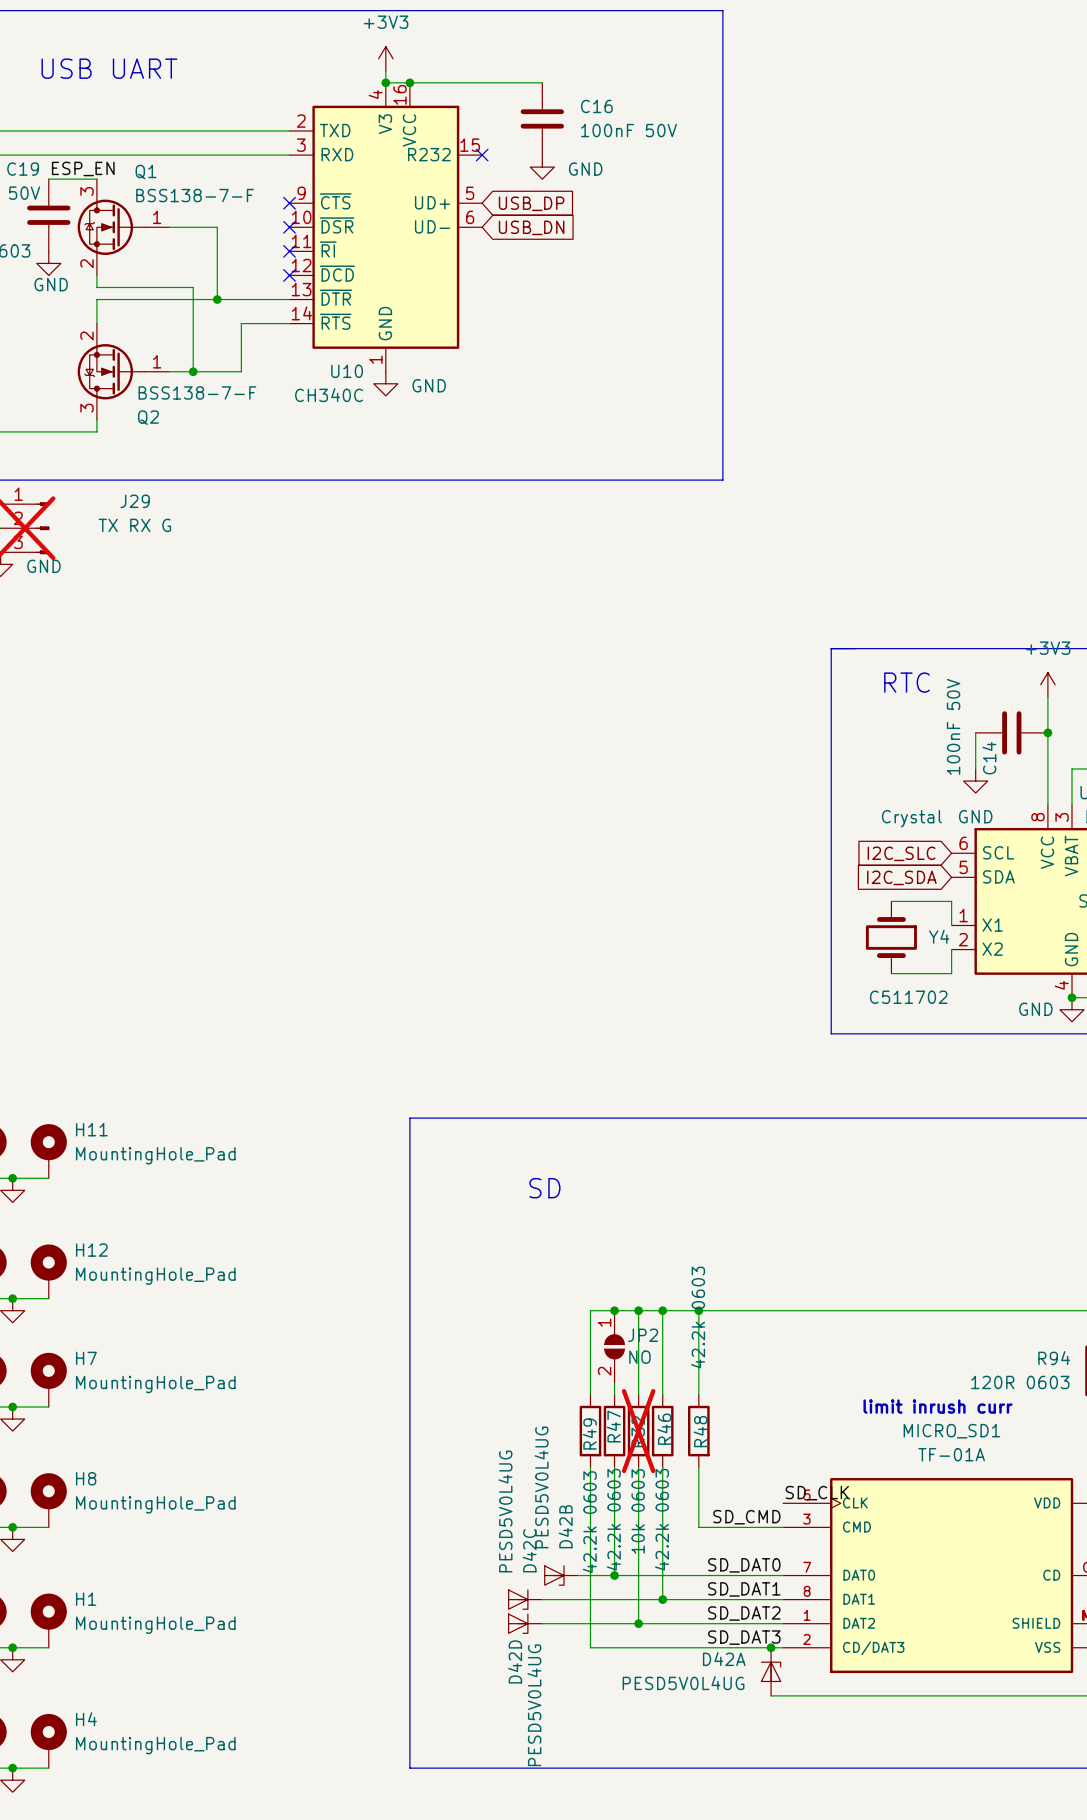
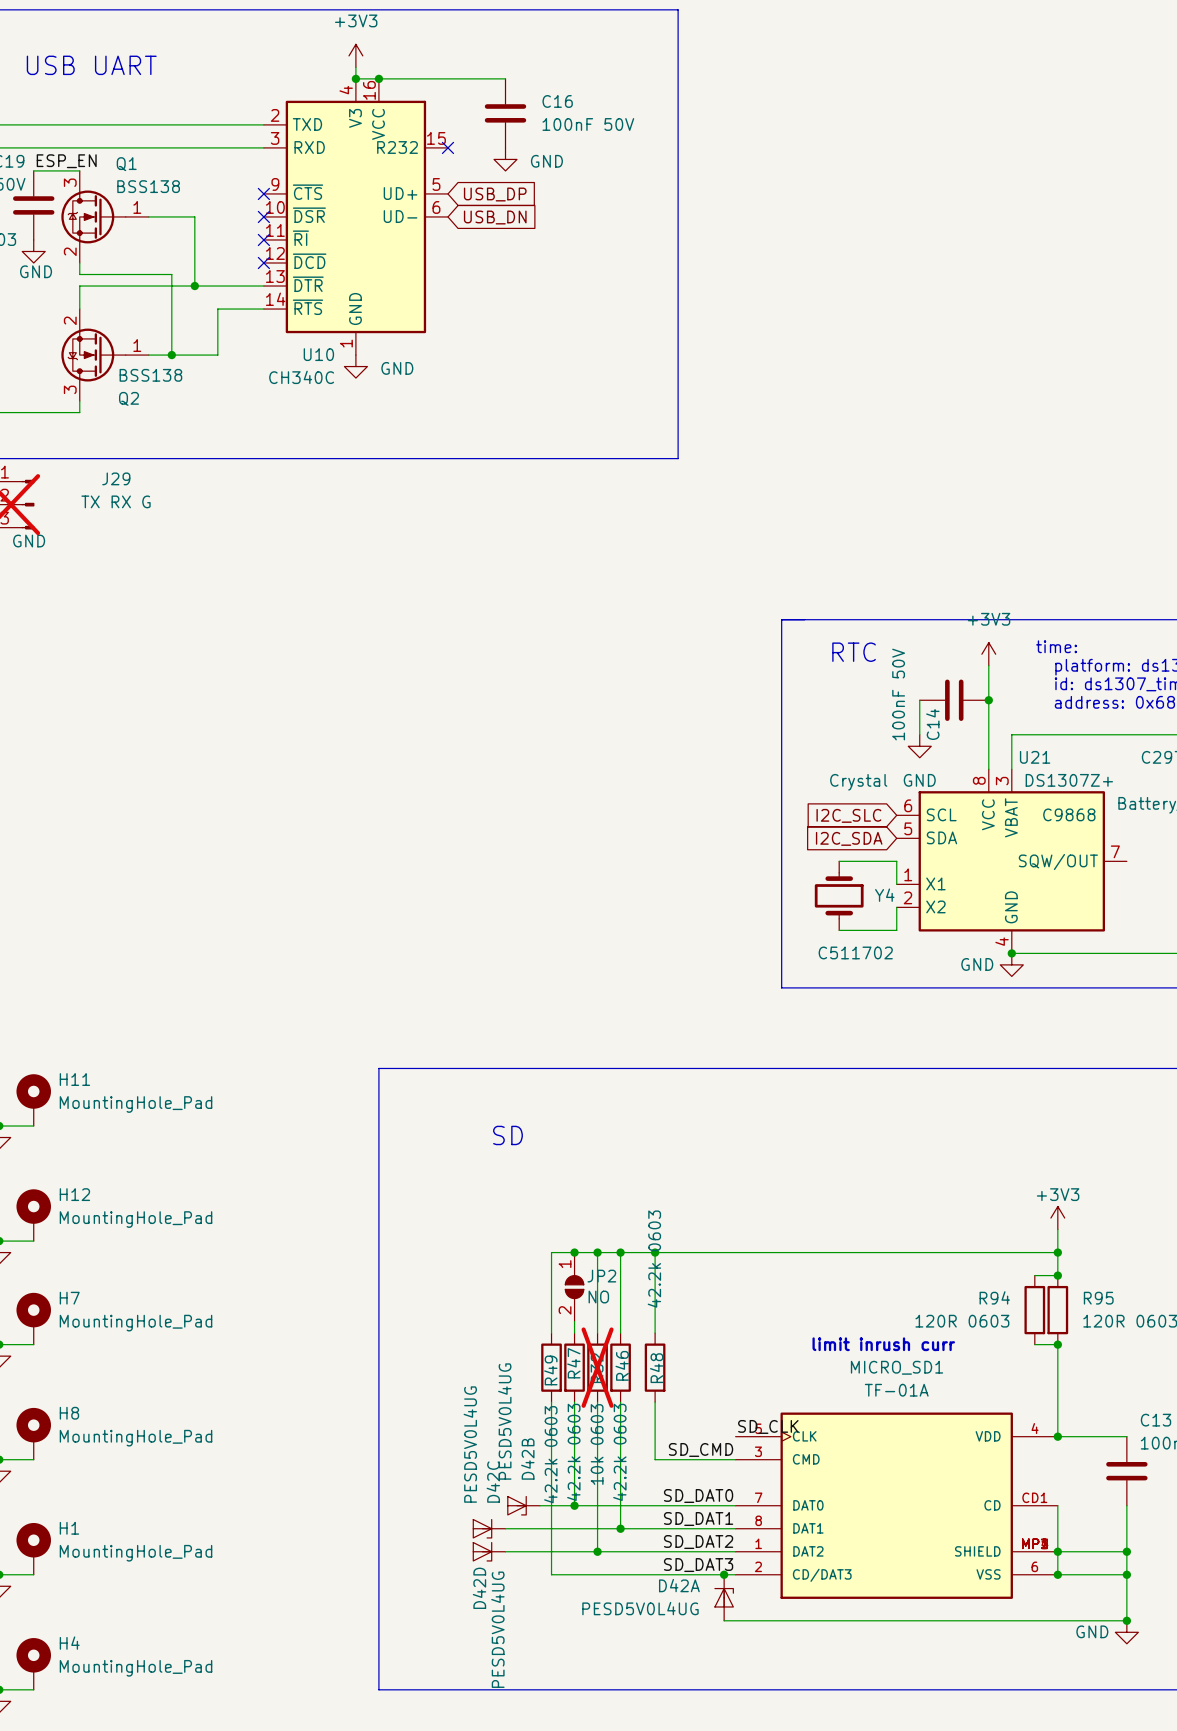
Q1 value: BSS138-7-F (195, 195) -> BSS138 (148, 186)
Q2 value: BSS138-7-F (197, 392) -> BSS138 (150, 375)

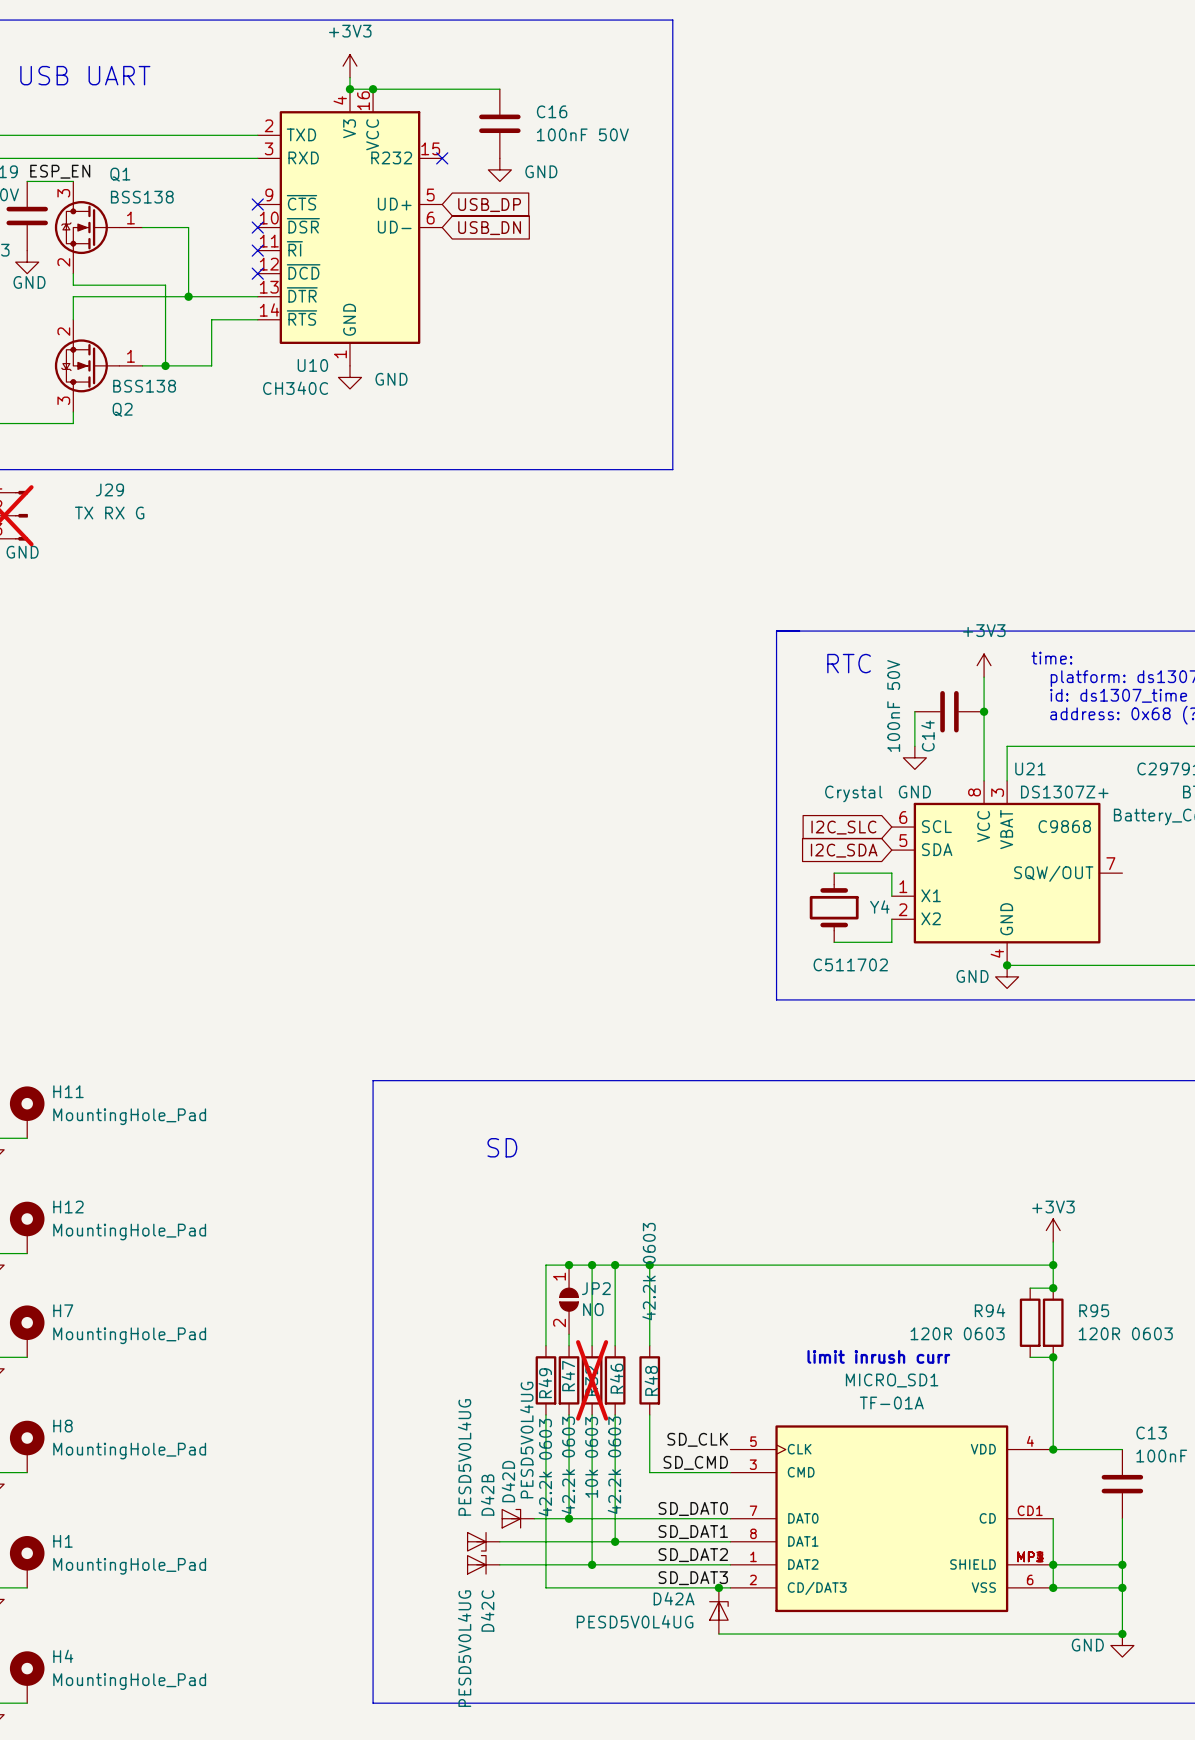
label position: SD_CLK (768, 1426) -> SD_CLK (697, 1439)
D42C name: D42C (493, 1482) -> D42B (487, 1495)
D42B: PESD5V0L4UG (523, 1505) -> none
D42D flip: as is (482, 1551) -> up-down (511, 1518)
D42D position: (489, 1551) -> (518, 1518)
D42C: none -> PESD5V0L4UG (483, 1564)

